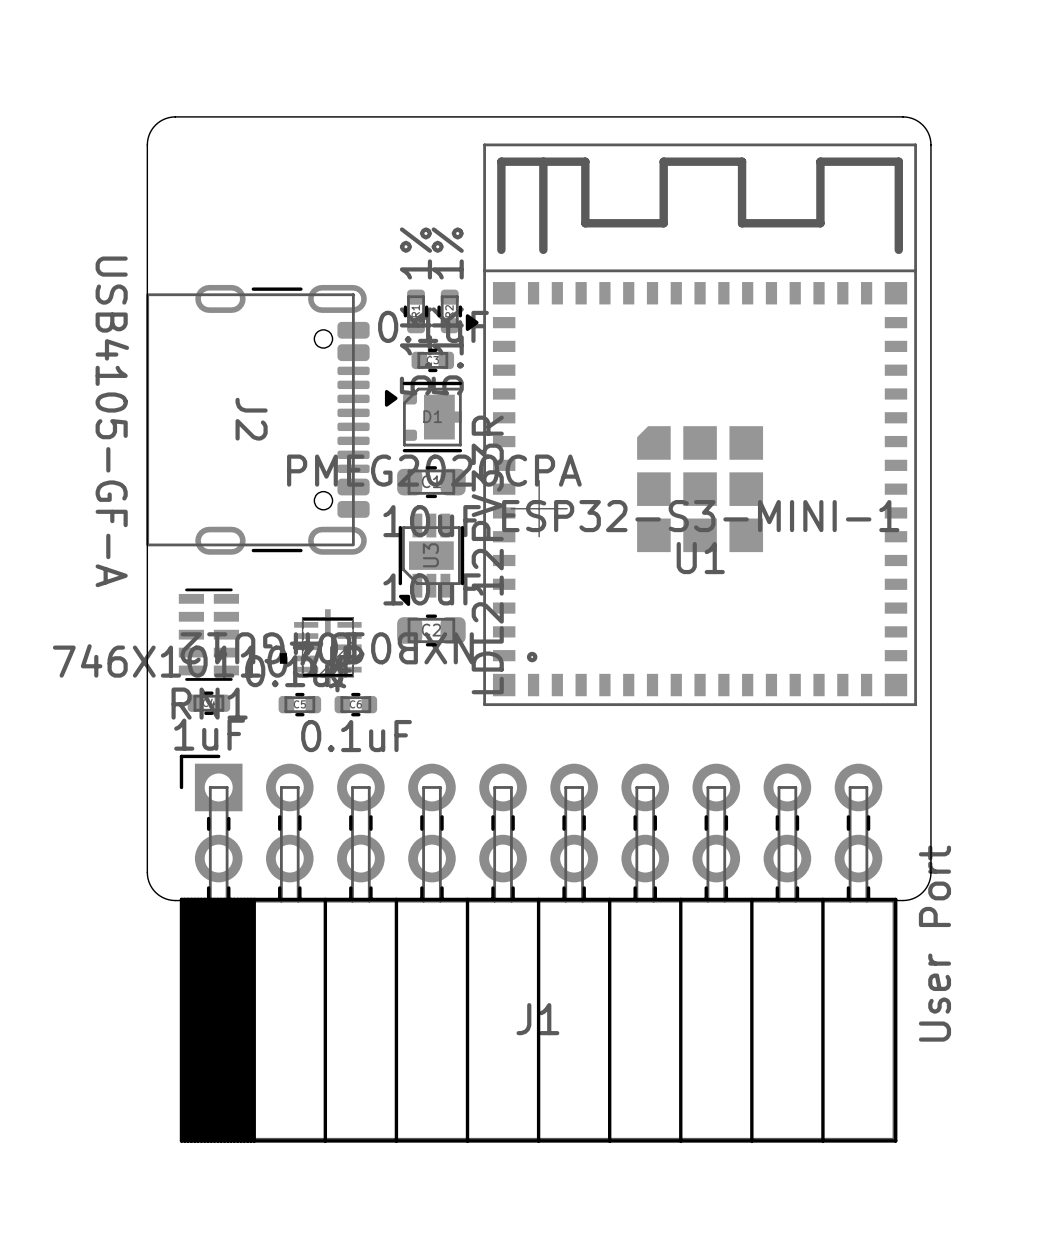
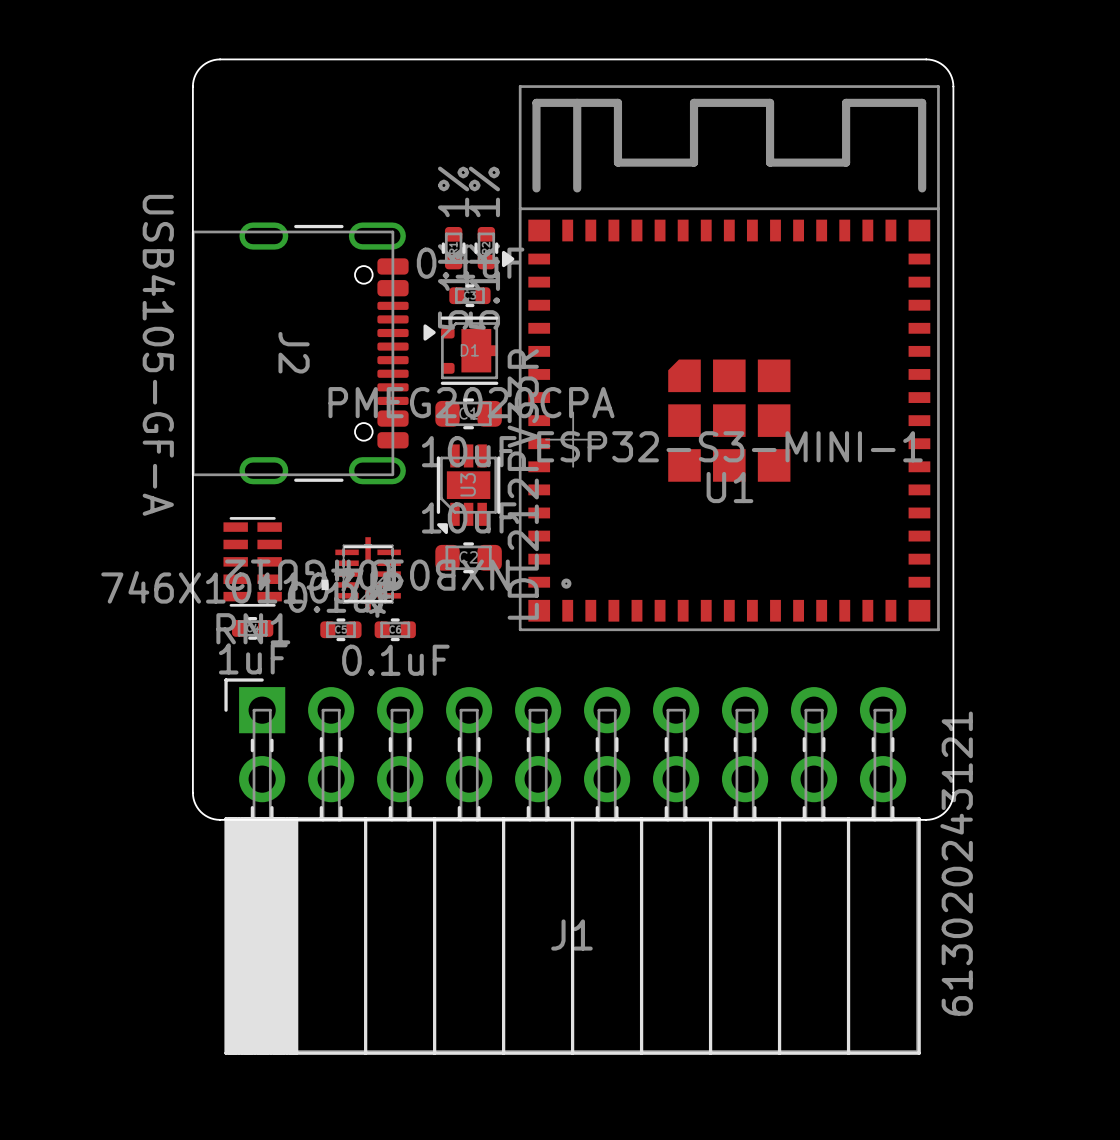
J1 value: User Port (934, 943) -> 613020243121 (956, 863)

